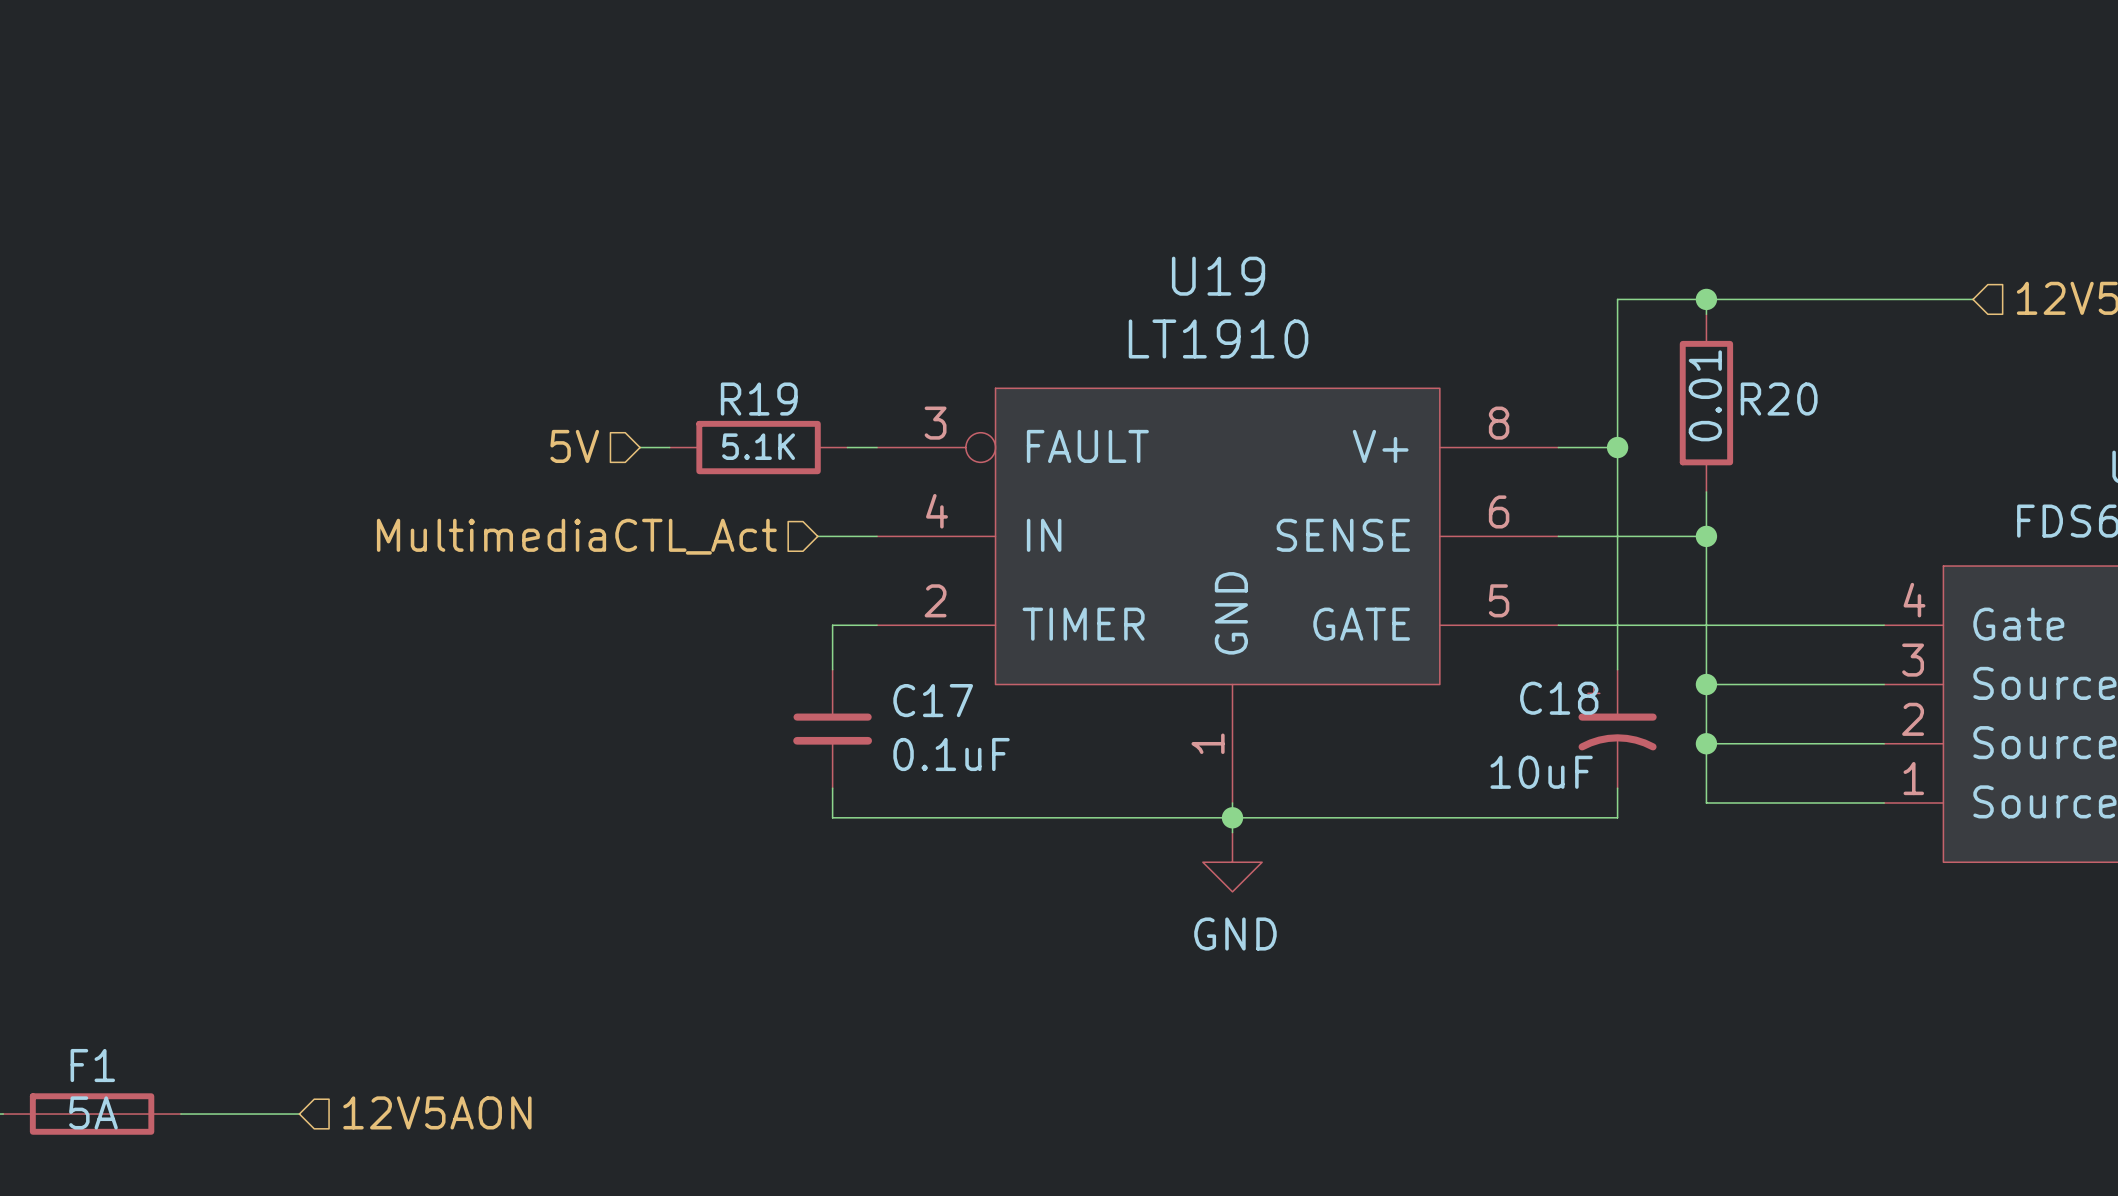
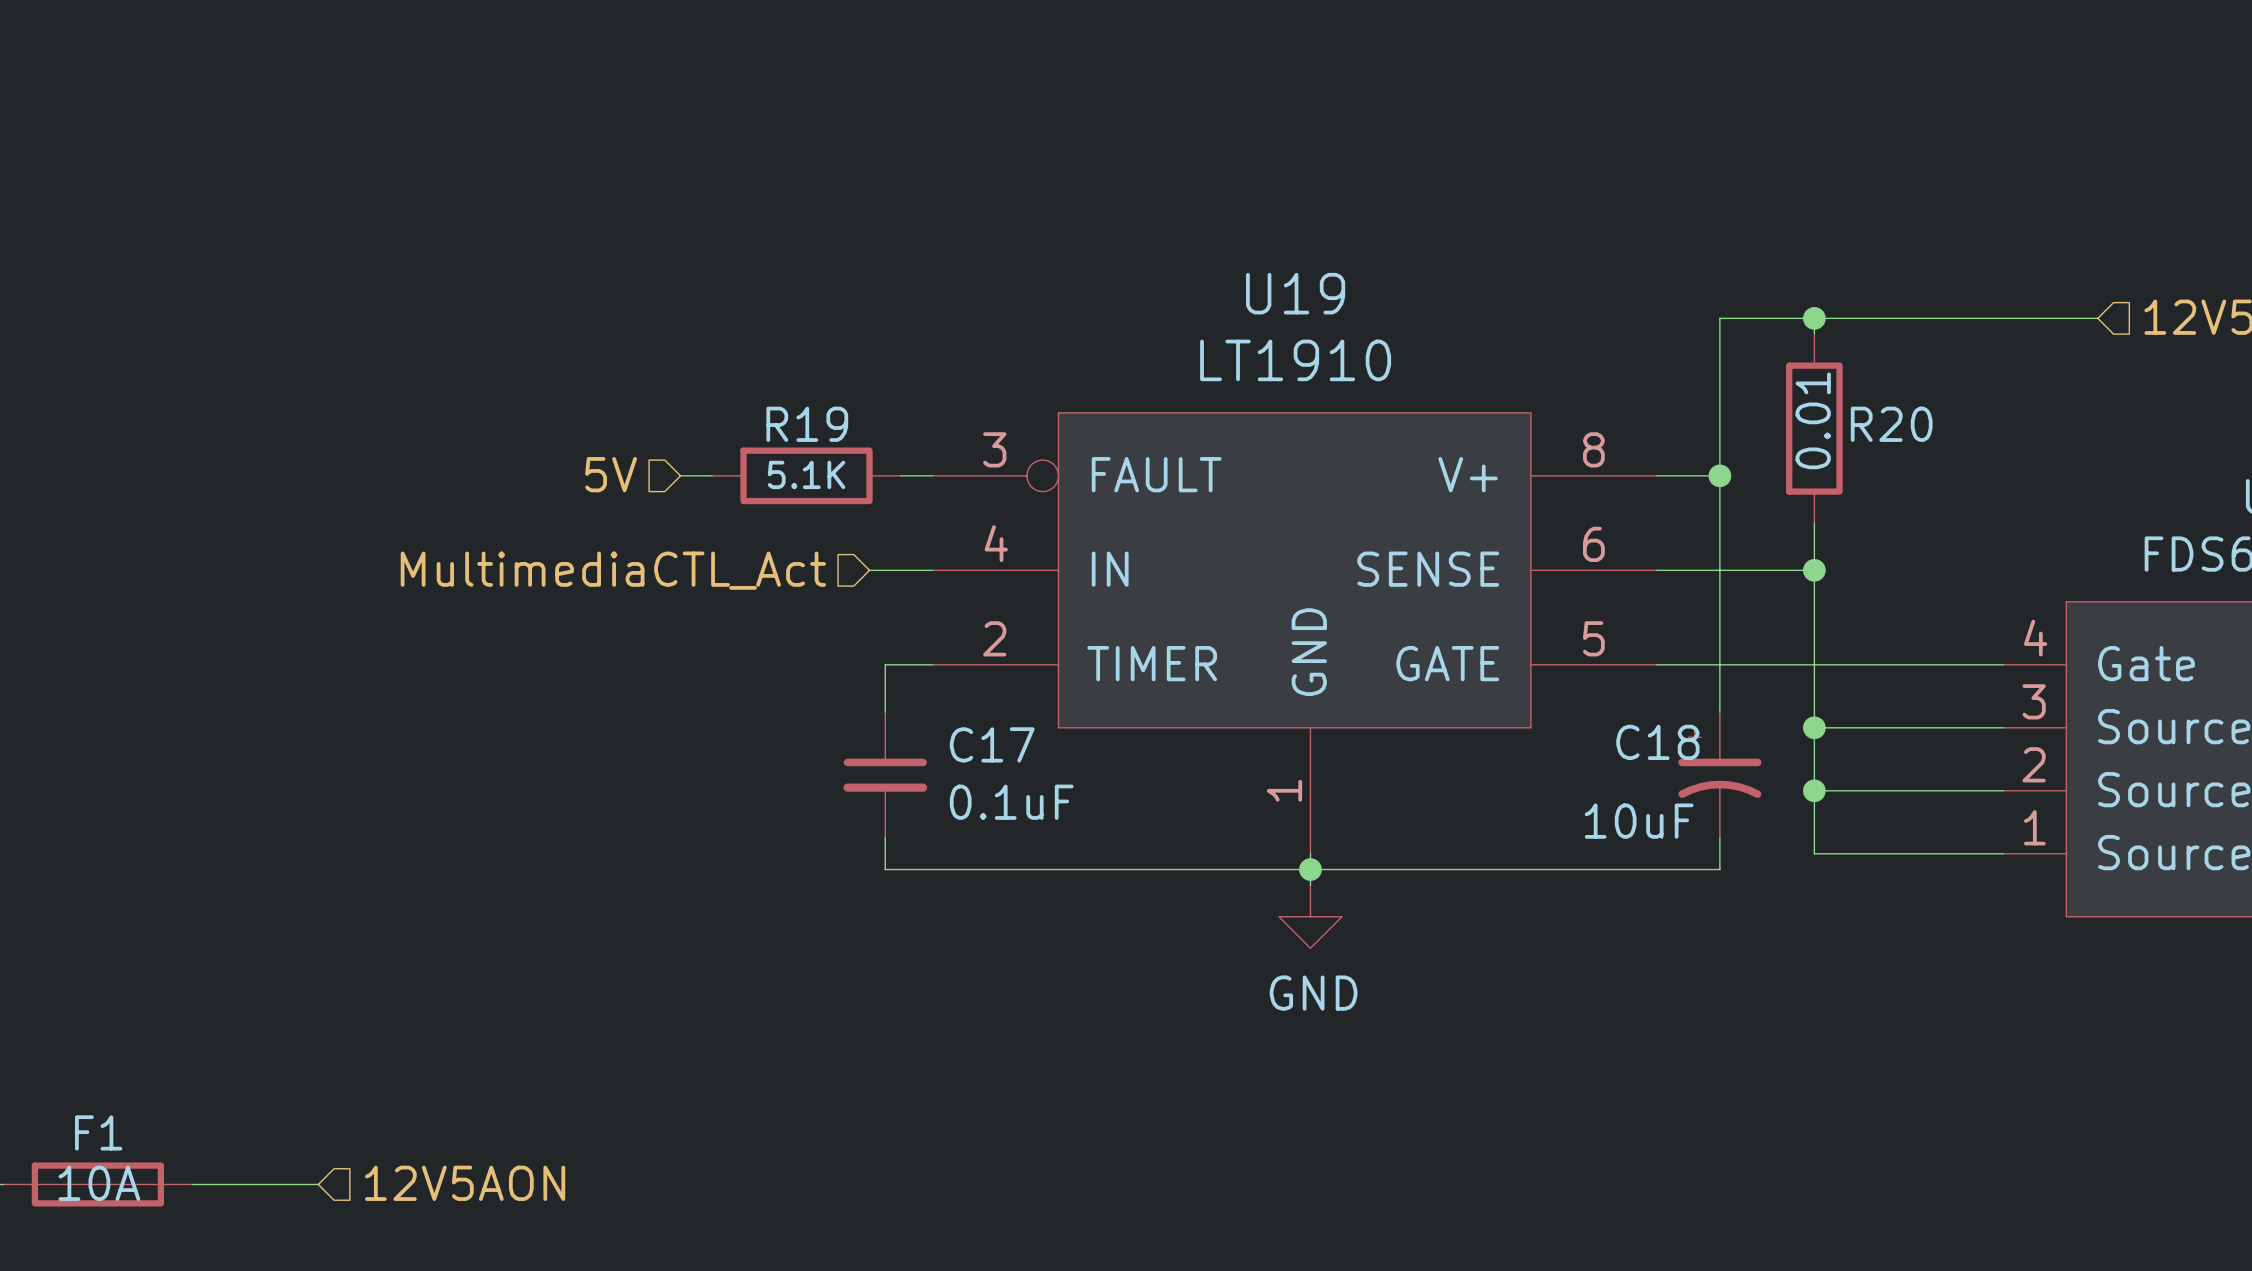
F1 value: 5A (93, 1112) -> 10A (99, 1183)

